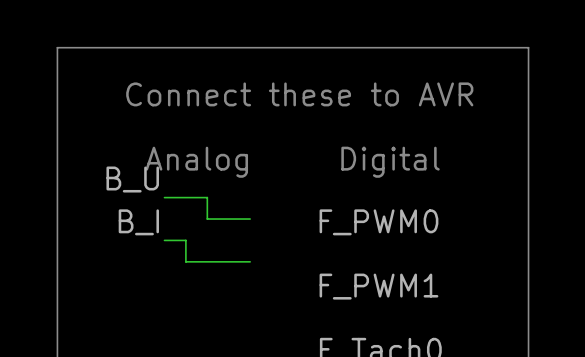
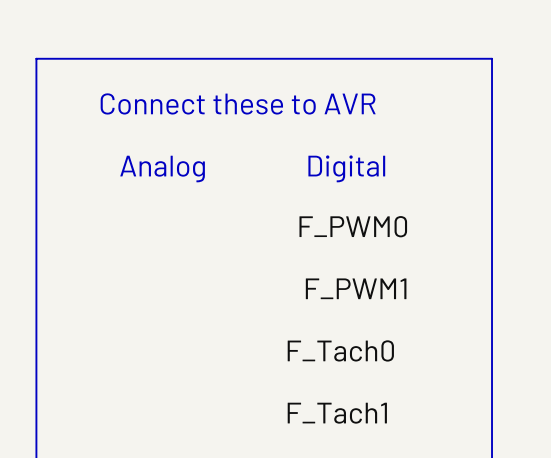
label: B_U (132, 179) -> none
wire: (164, 197) (207, 197) (207, 219) (250, 219) -> none
label: B_I (138, 222) -> none
wire: (164, 240) (185, 240) (185, 261) (250, 261) -> none

